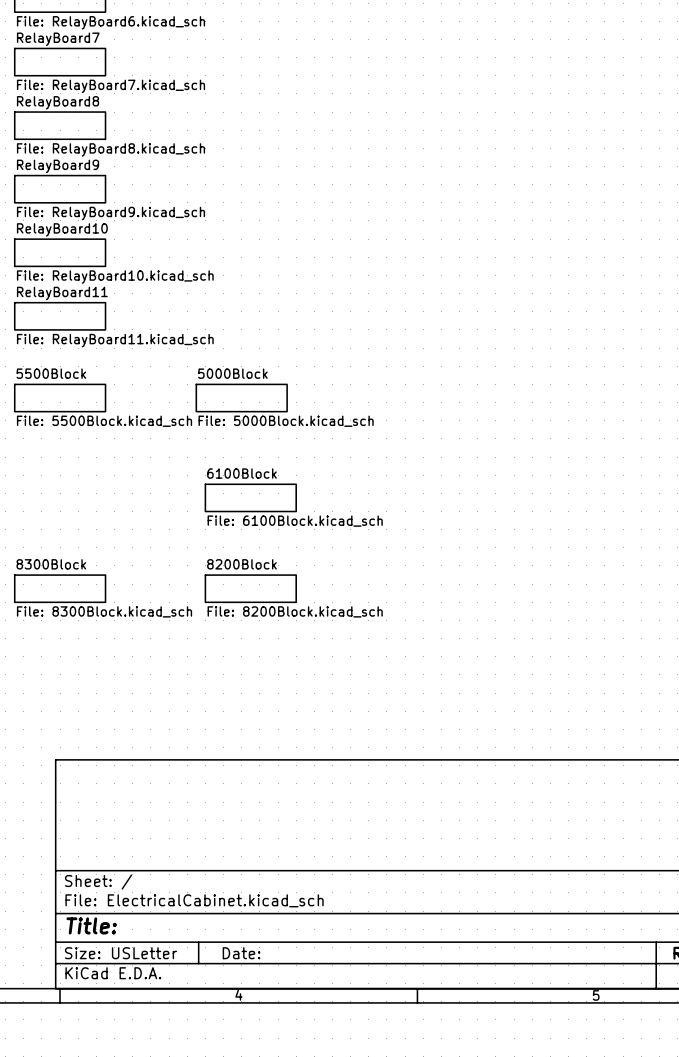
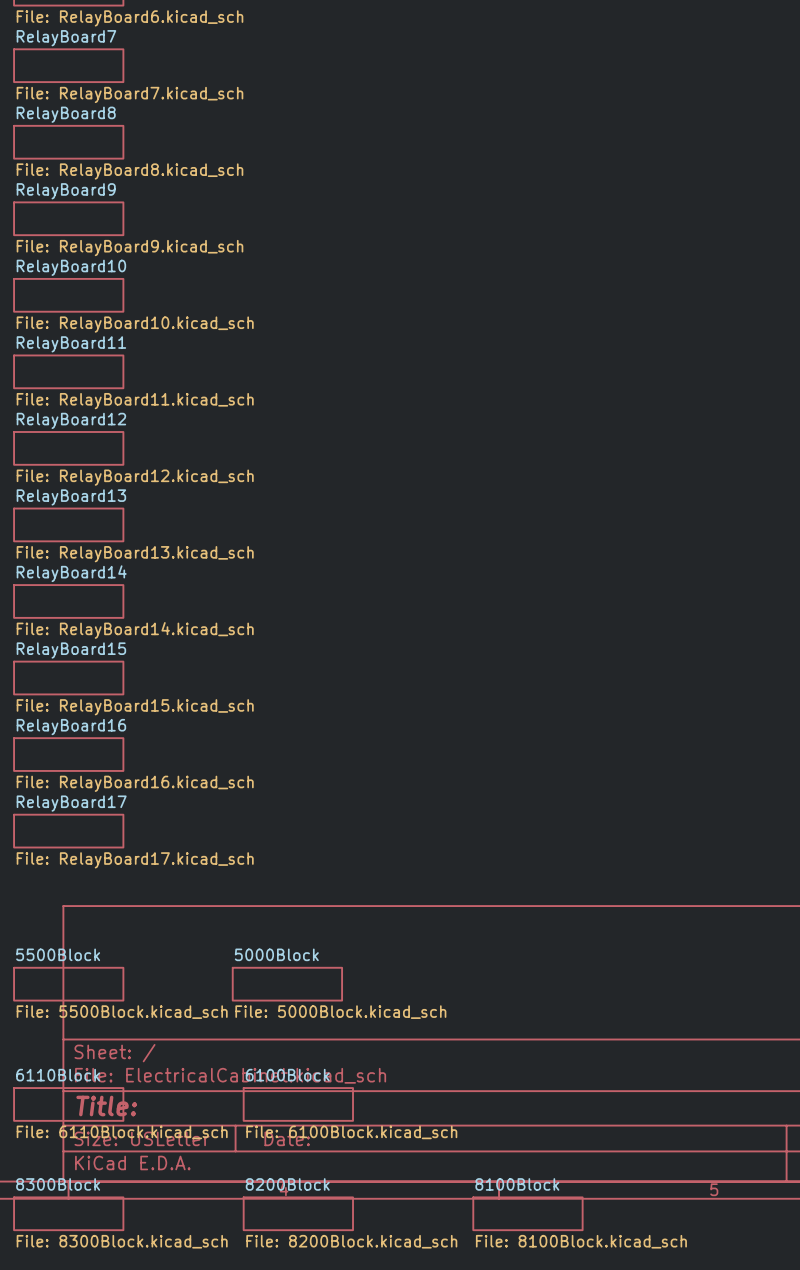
sheet RelayBoard12: none -> File: RelayBoard12.kicad_sch (68, 448)
sheet 5500Block position: (60, 398) -> (68, 984)
sheet 5000Block position: (241, 398) -> (287, 984)
sheet RelayBoard13: none -> File: RelayBoard13.kicad_sch (68, 524)
sheet 6100Block position: (250, 497) -> (298, 1104)
sheet RelayBoard14: none -> File: RelayBoard14.kicad_sch (68, 601)
sheet RelayBoard15: none -> File: RelayBoard15.kicad_sch (68, 678)
sheet 8300Block position: (60, 588) -> (68, 1213)
sheet 8200Block position: (250, 588) -> (298, 1213)
sheet RelayBoard16: none -> File: RelayBoard16.kicad_sch (68, 754)
sheet RelayBoard17: none -> File: RelayBoard17.kicad_sch (68, 831)
sheet 6110Block: none -> File: 6110Block.kicad_sch (68, 1104)
sheet 8100Block: none -> File: 8100Block.kicad_sch (527, 1213)

